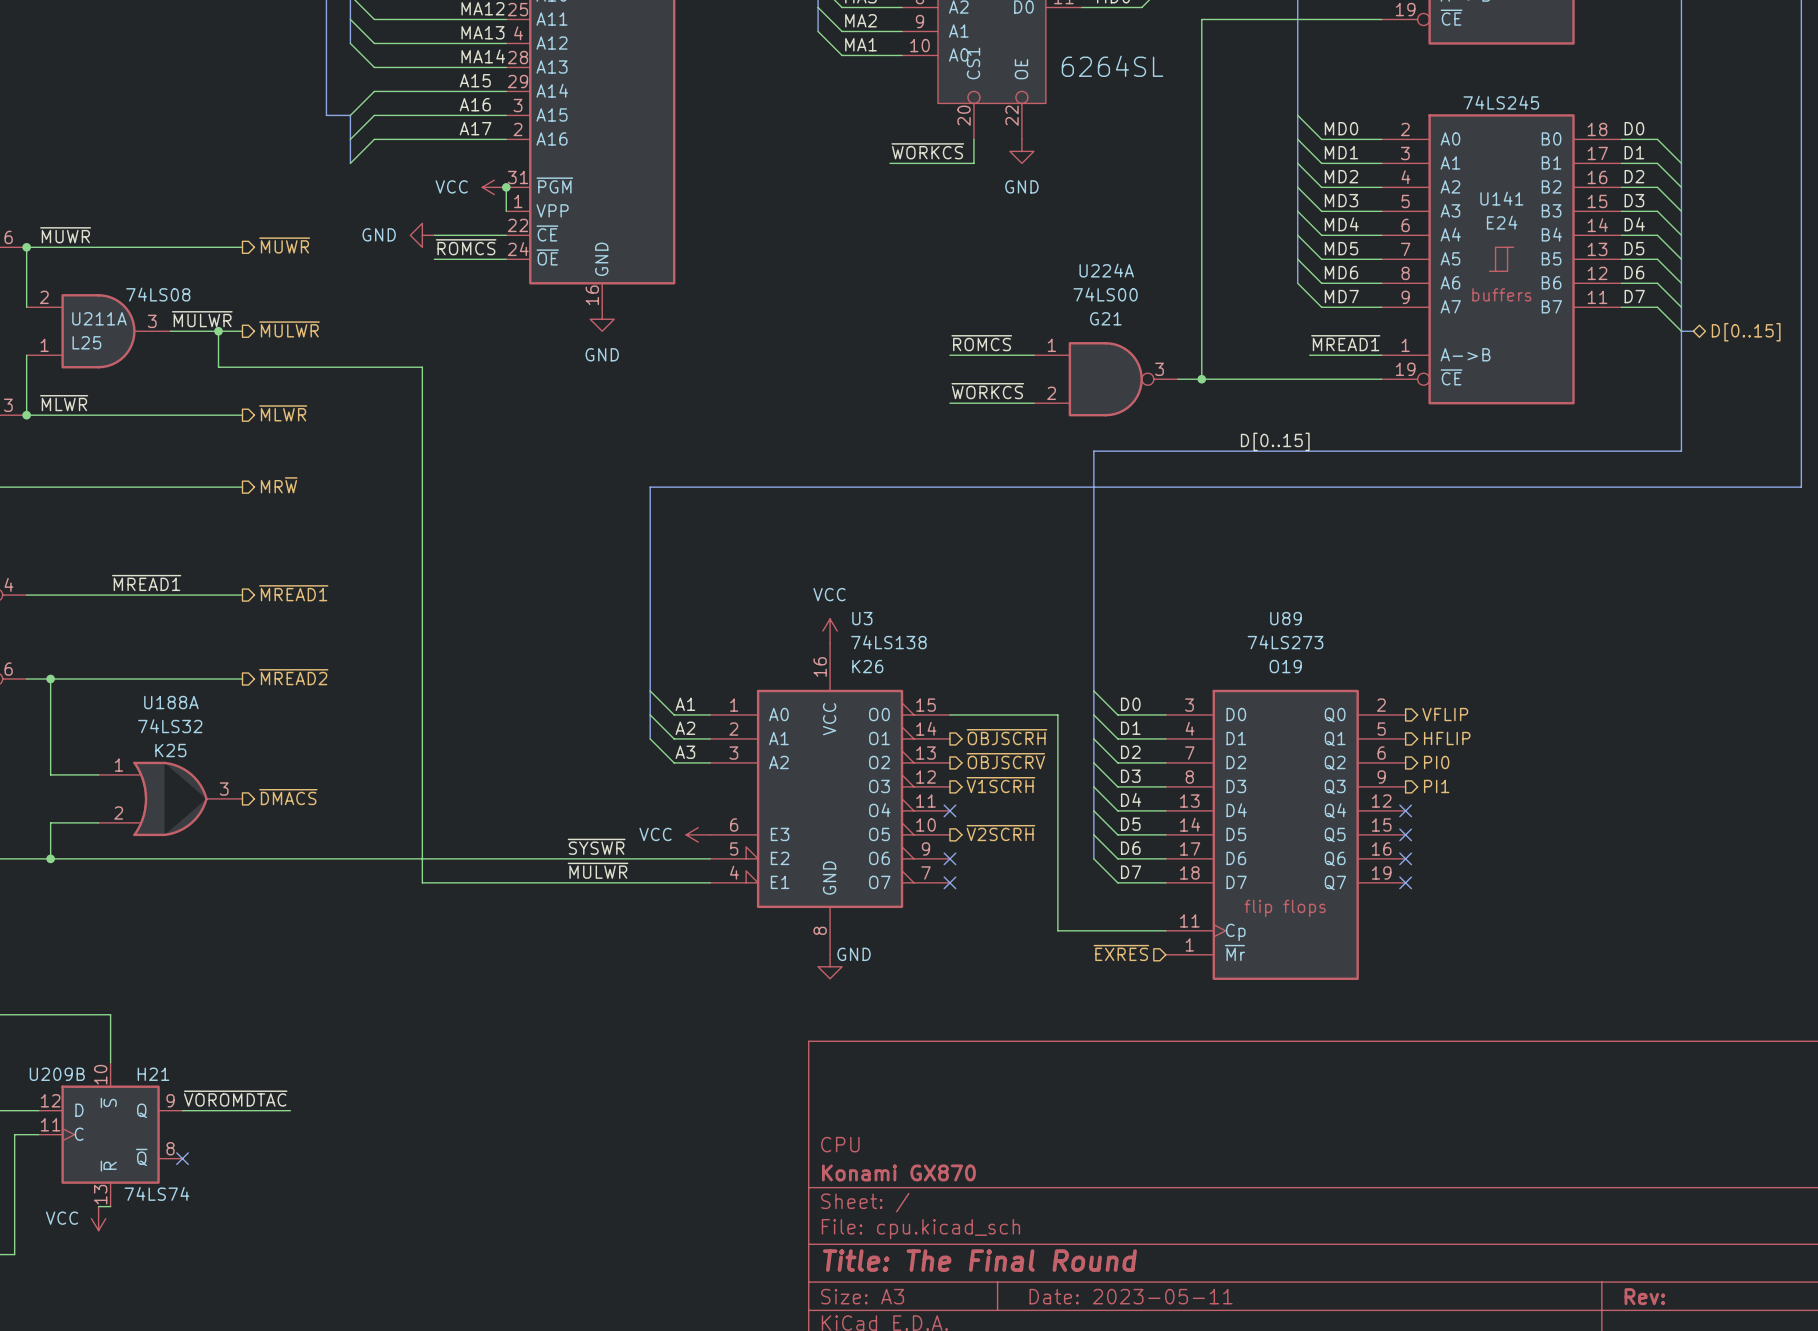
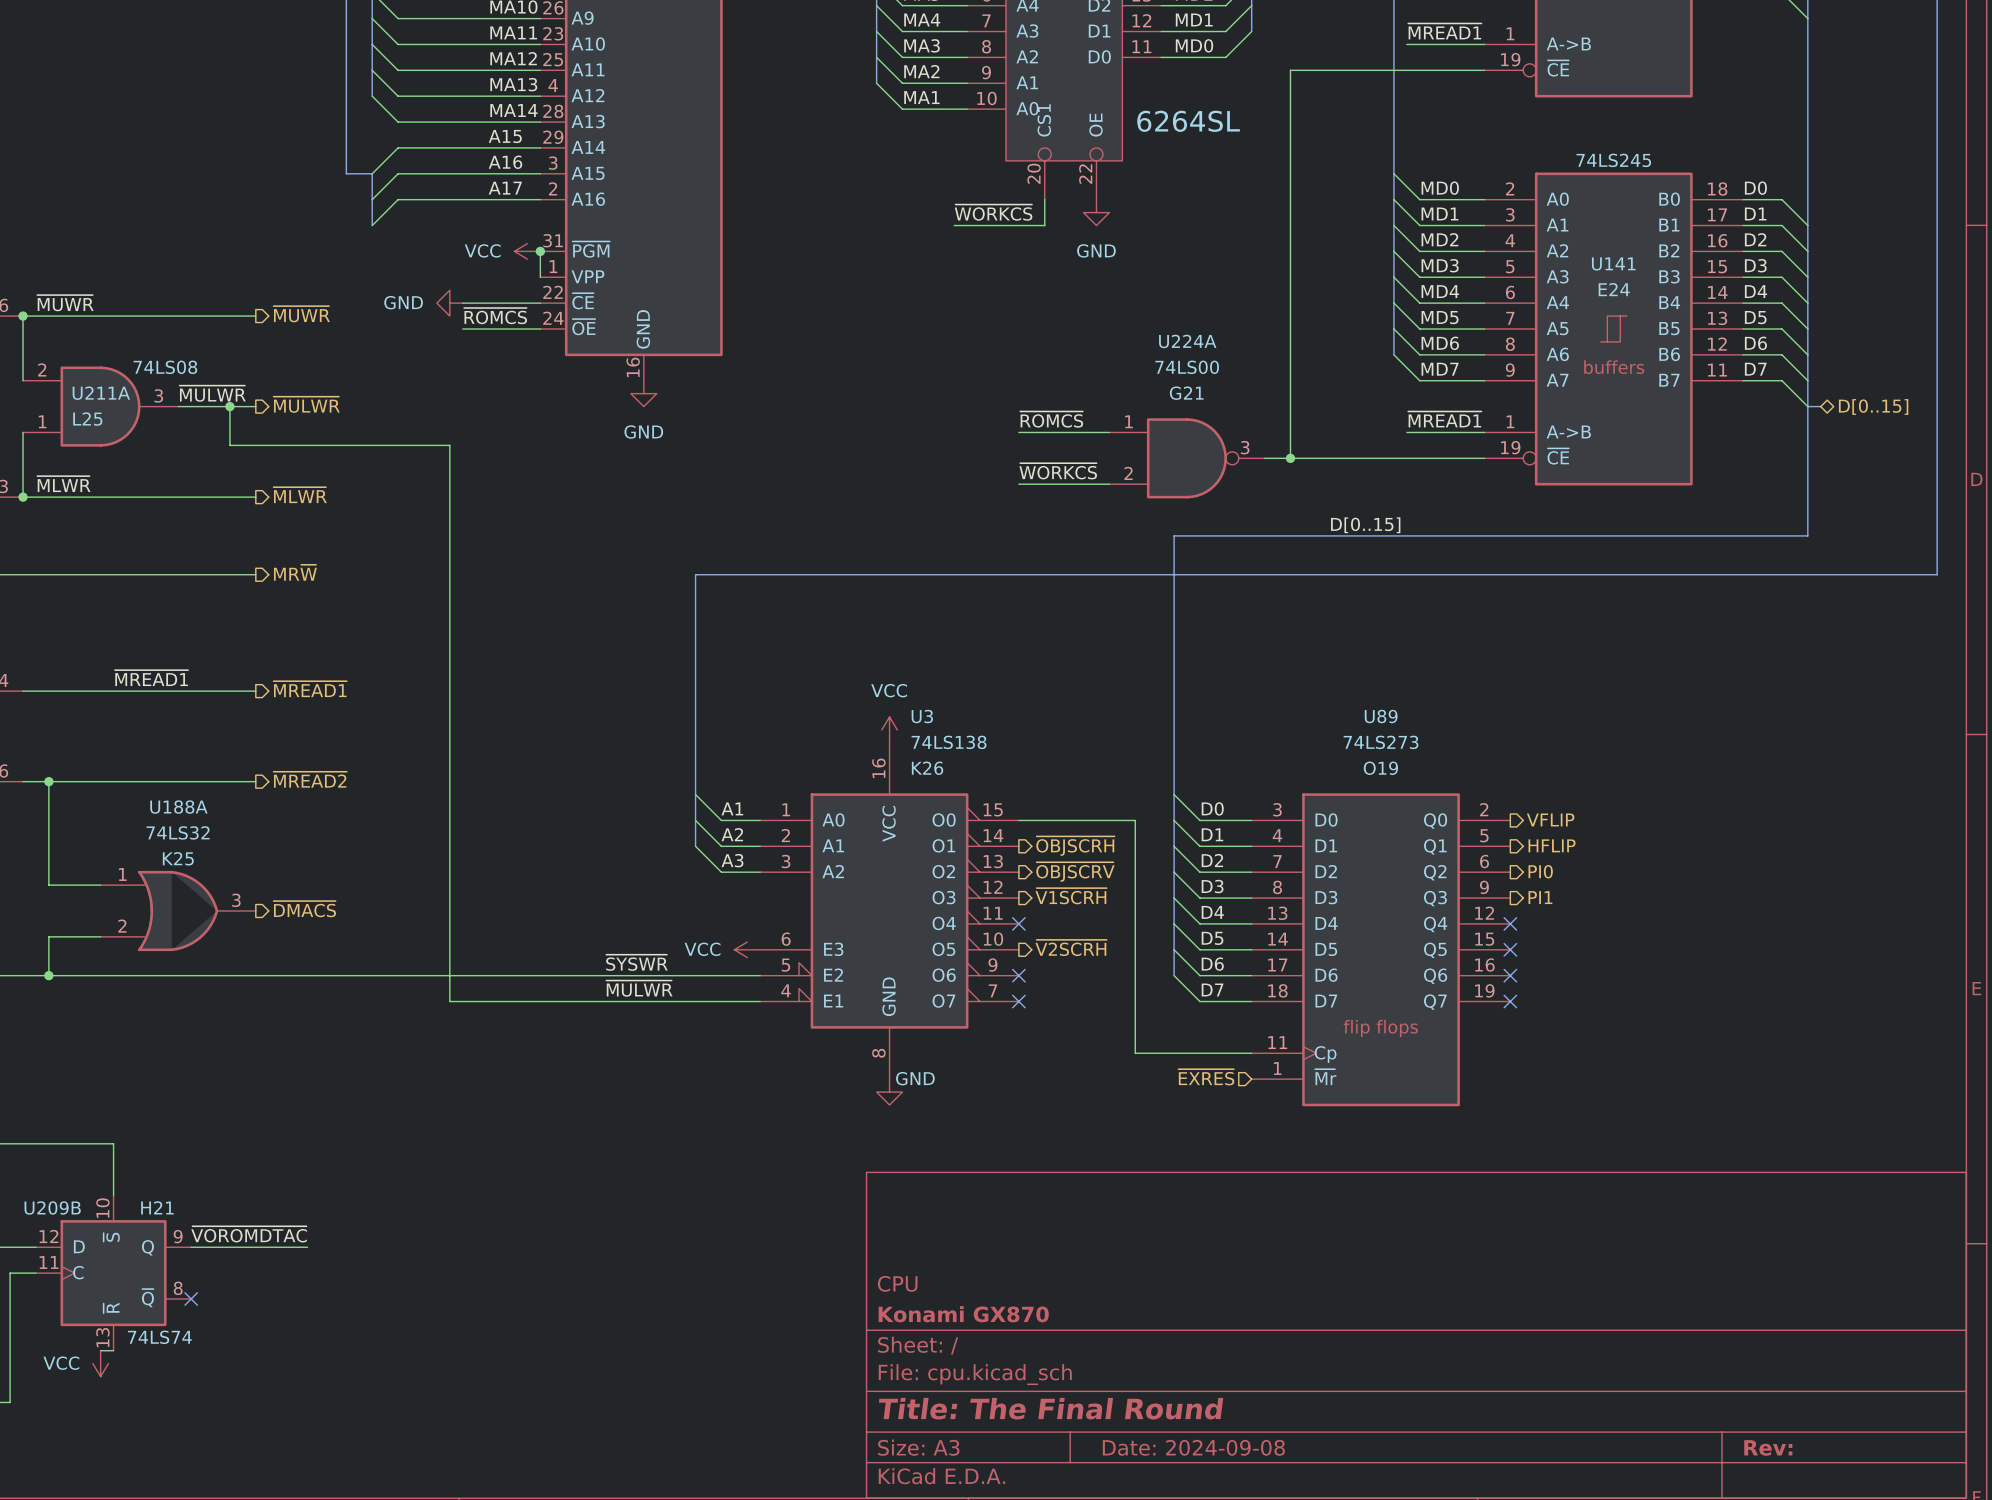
title block: Date: 2023-05-11 (1131, 1296) -> Date: 2024-09-08 (1193, 1447)

